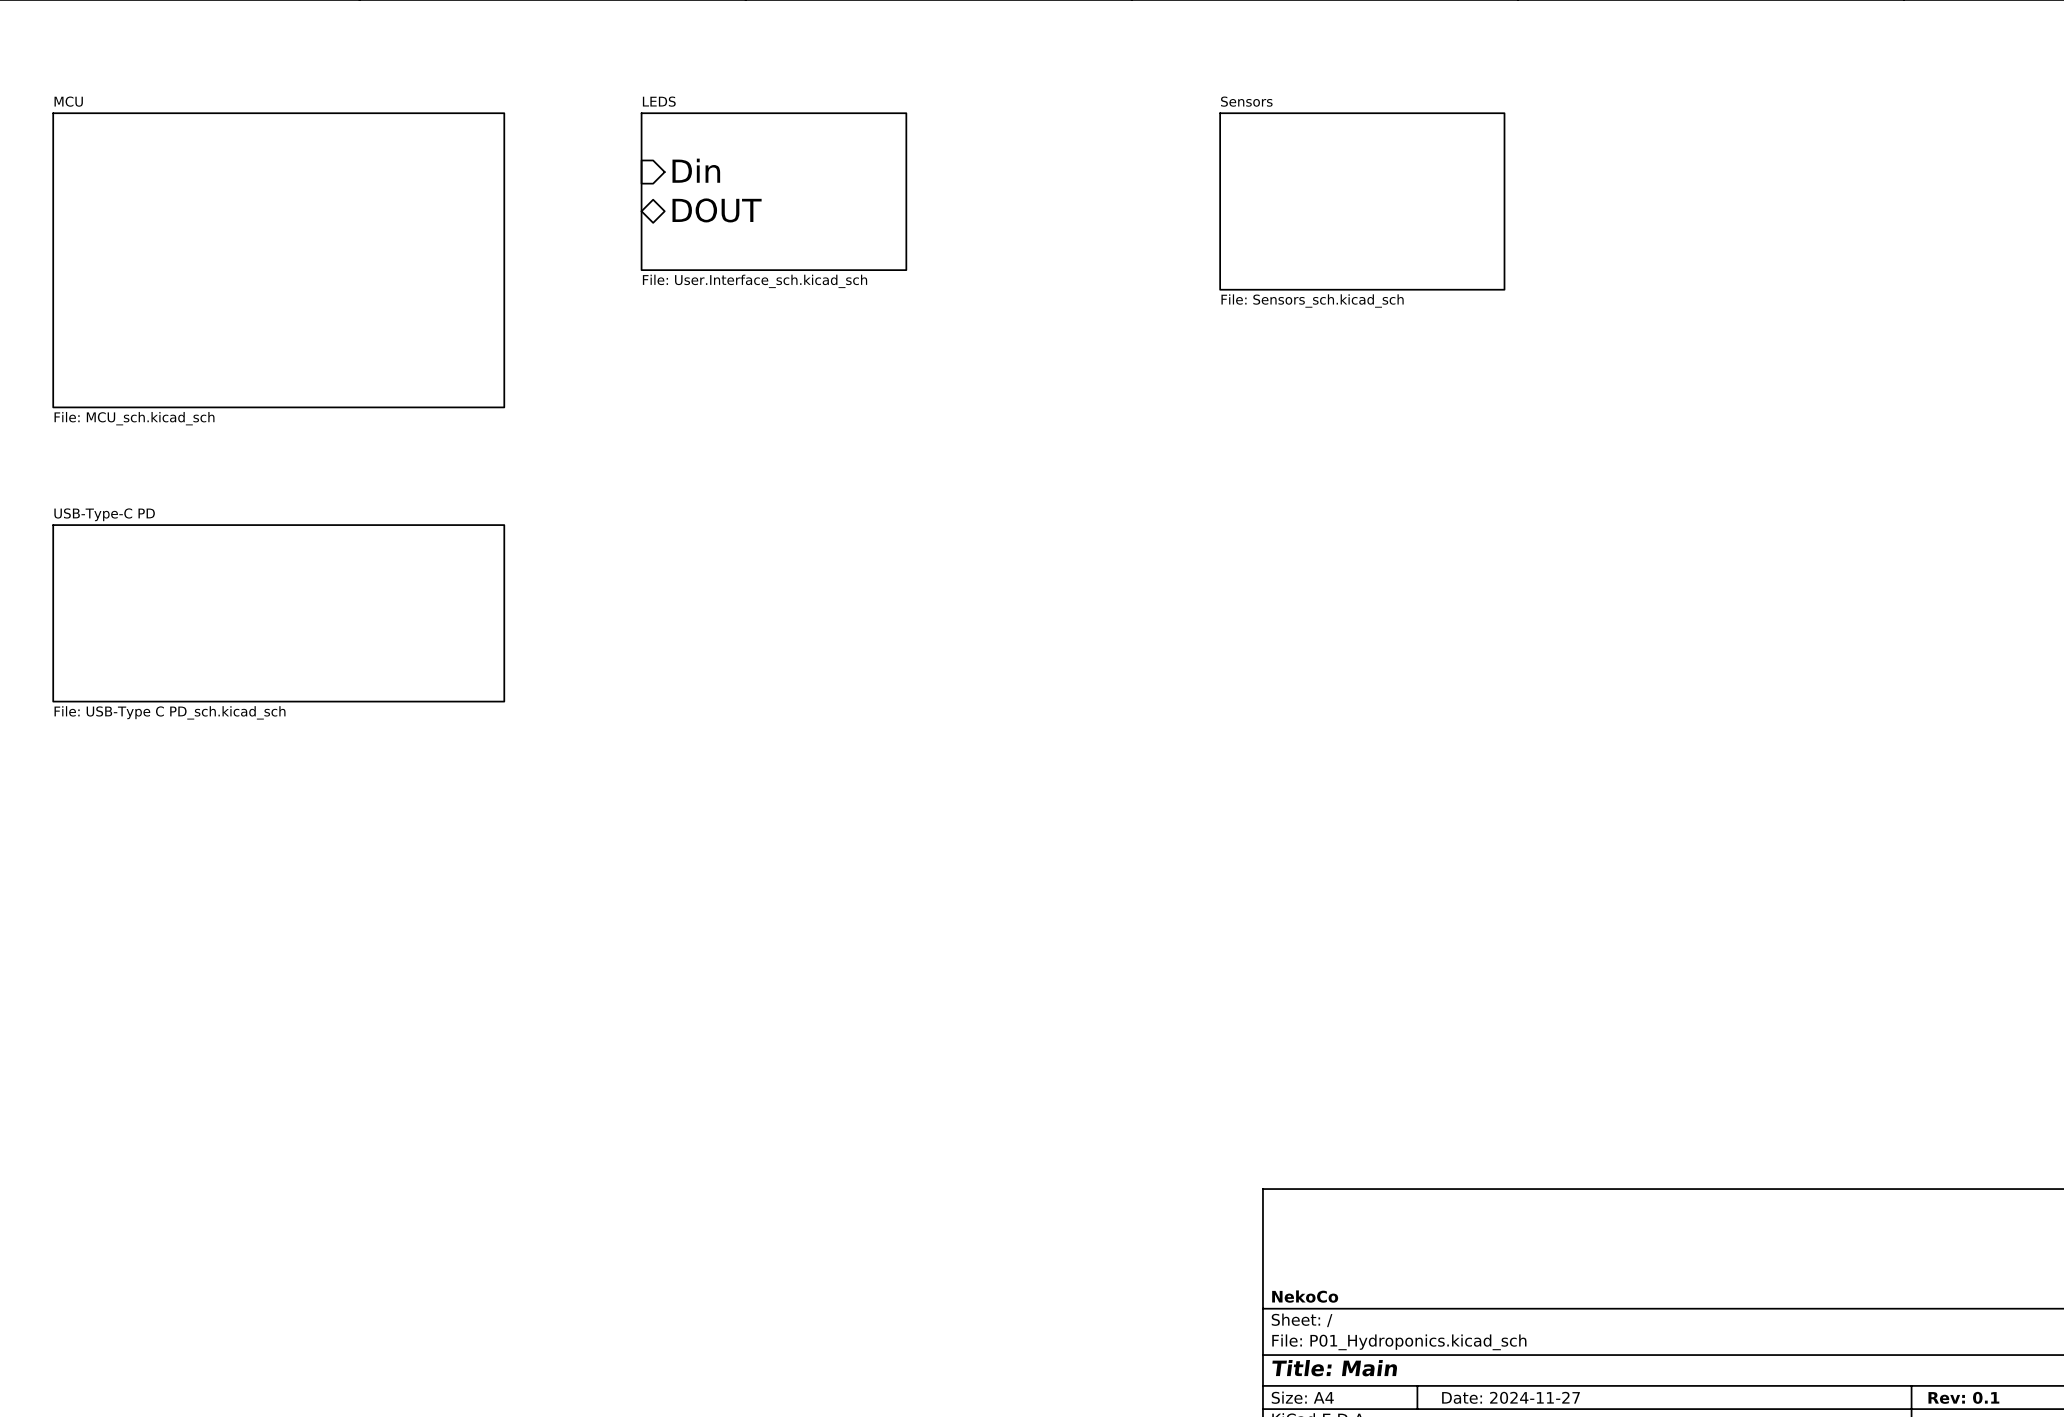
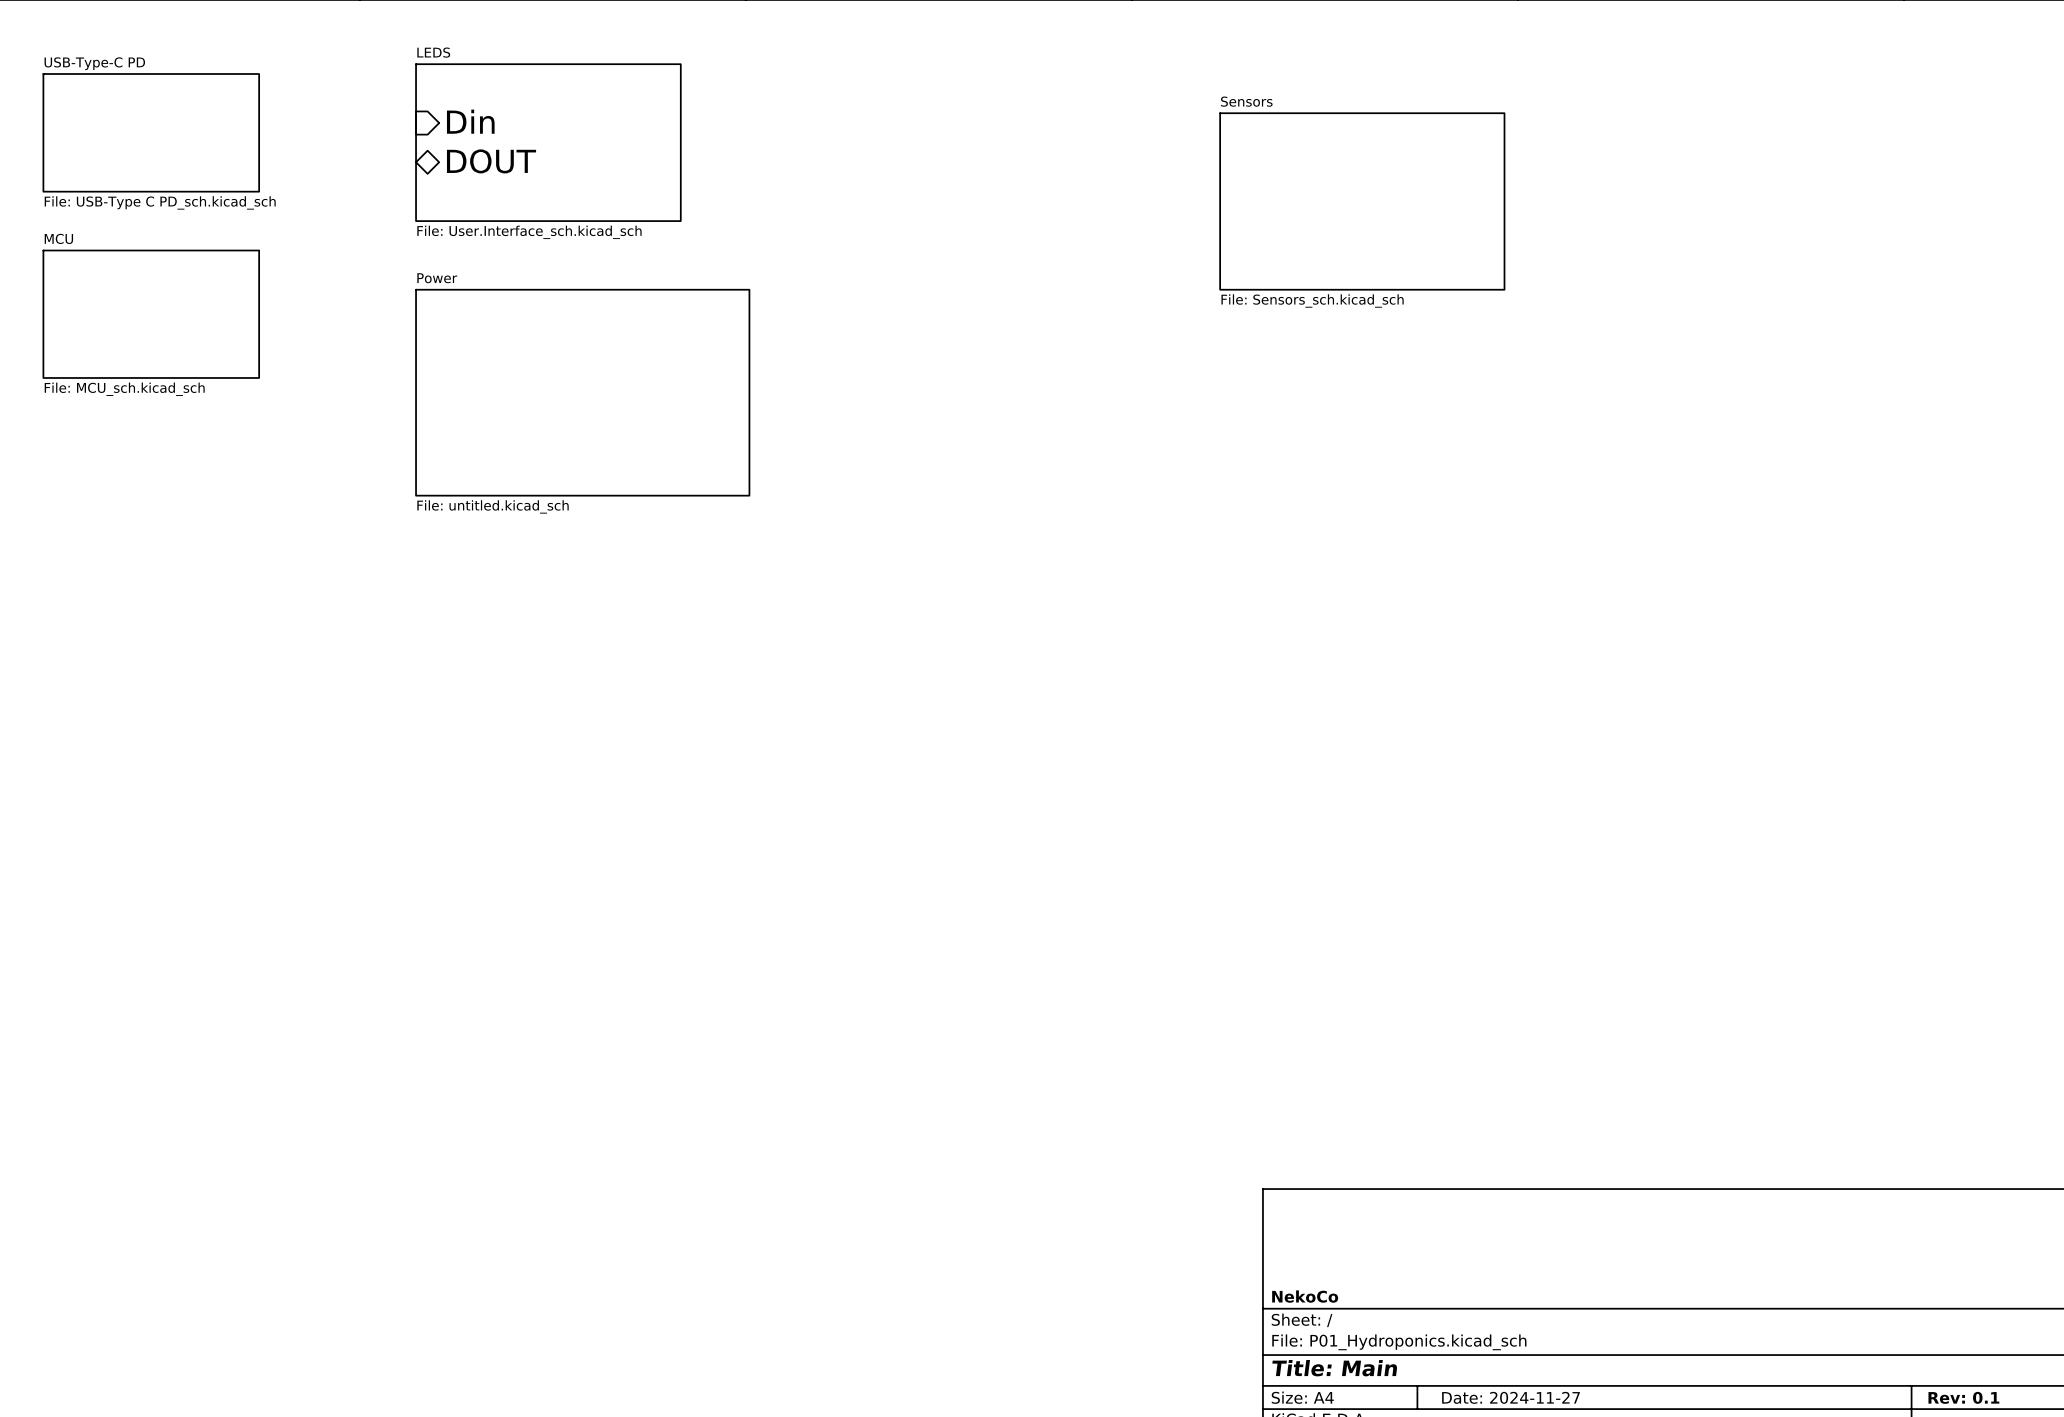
sheet pin: none -> Din (470, 121)
sheet USB-Type-C PD: none -> File: USB-Type C PD_sch.kicad_sch (151, 132)
sheet LEDS: none -> File: User.Interface_sch.kicad_sch (548, 142)
sheet pin: none -> DOUT (491, 161)
sheet pin: Din (696, 170) -> none
sheet LEDS: File: User.Interface_sch.kicad_sch (773, 191) -> none
sheet pin: DOUT (717, 210) -> none
sheet MCU: File: MCU_sch.kicad_sch (278, 260) -> none
sheet MCU: none -> File: MCU_sch.kicad_sch (151, 314)
sheet Power: none -> File: untitled.kicad_sch (582, 392)
sheet USB-Type-C PD: File: USB-Type C PD_sch.kicad_sch (278, 613) -> none

